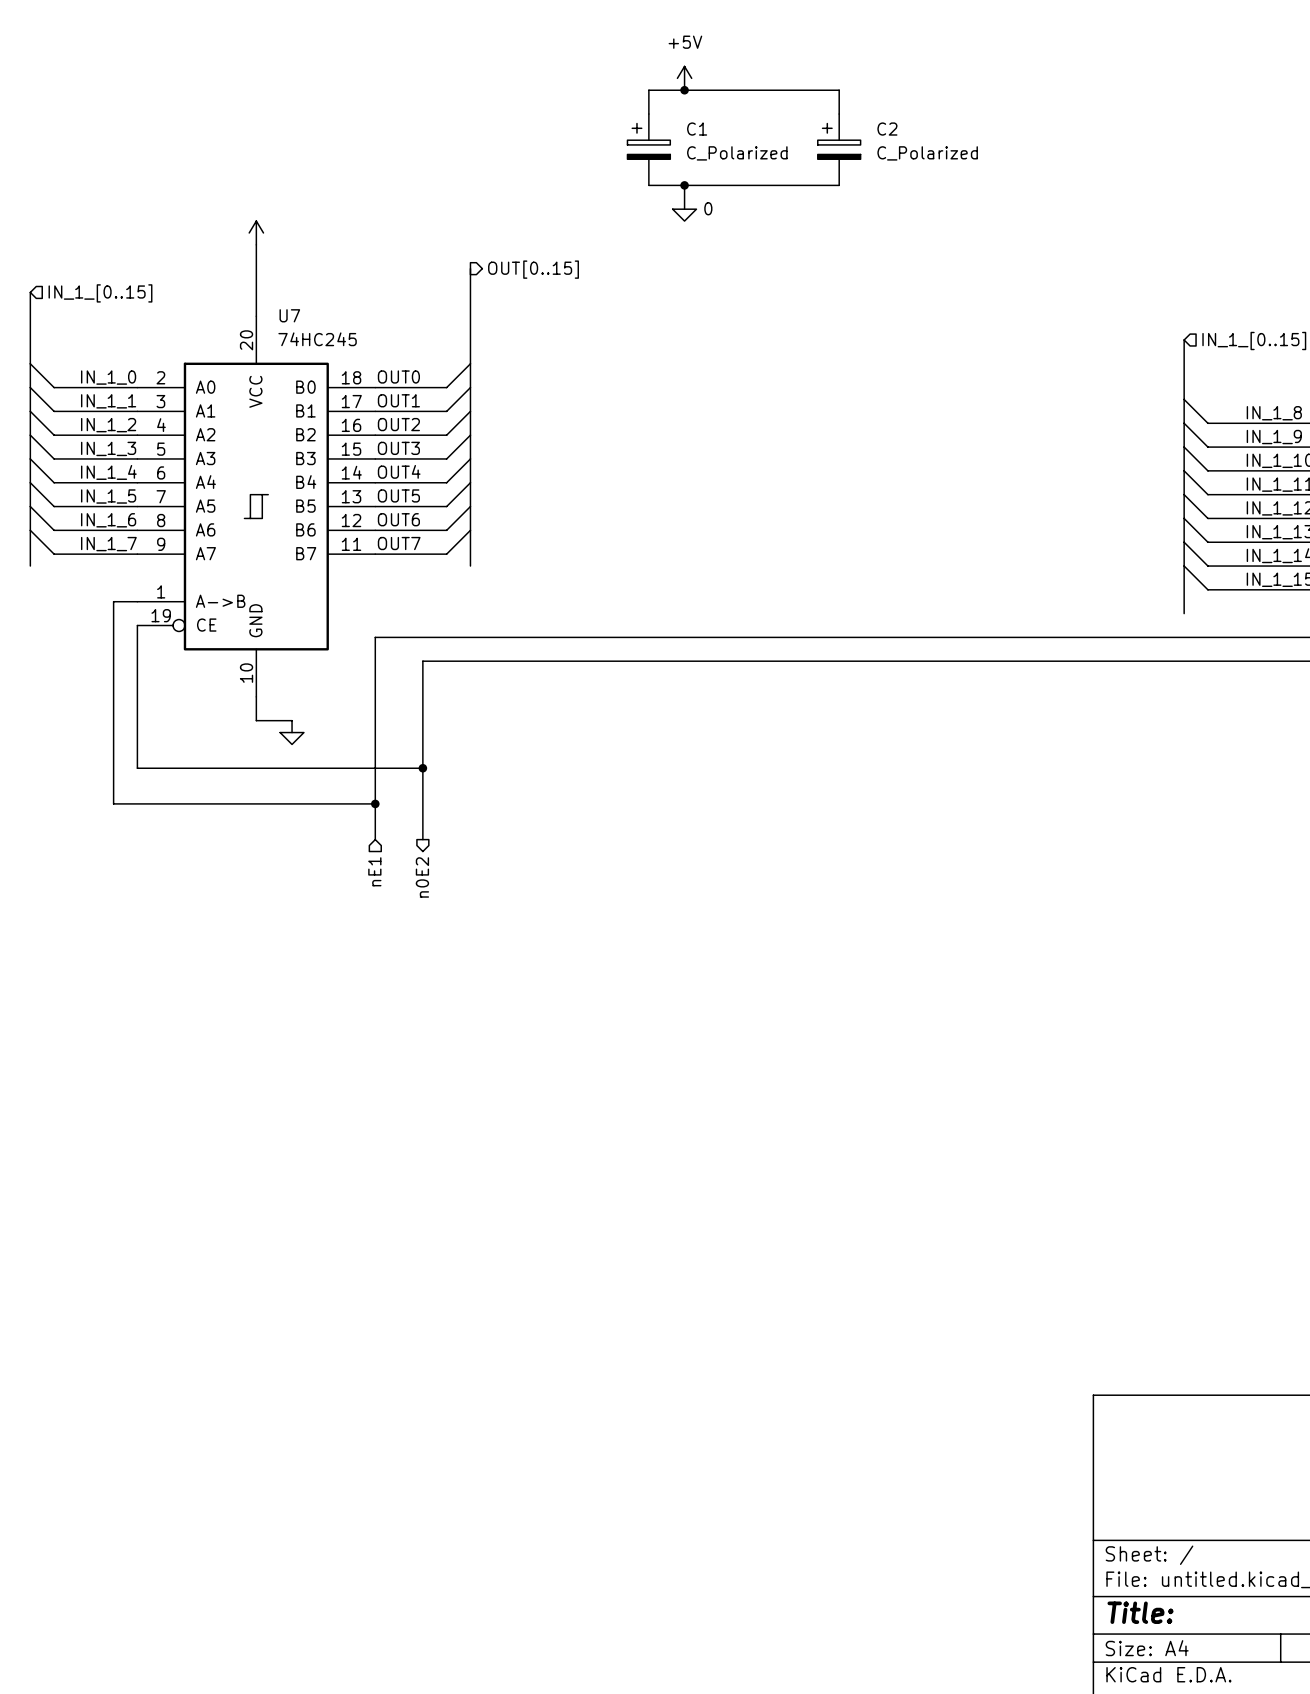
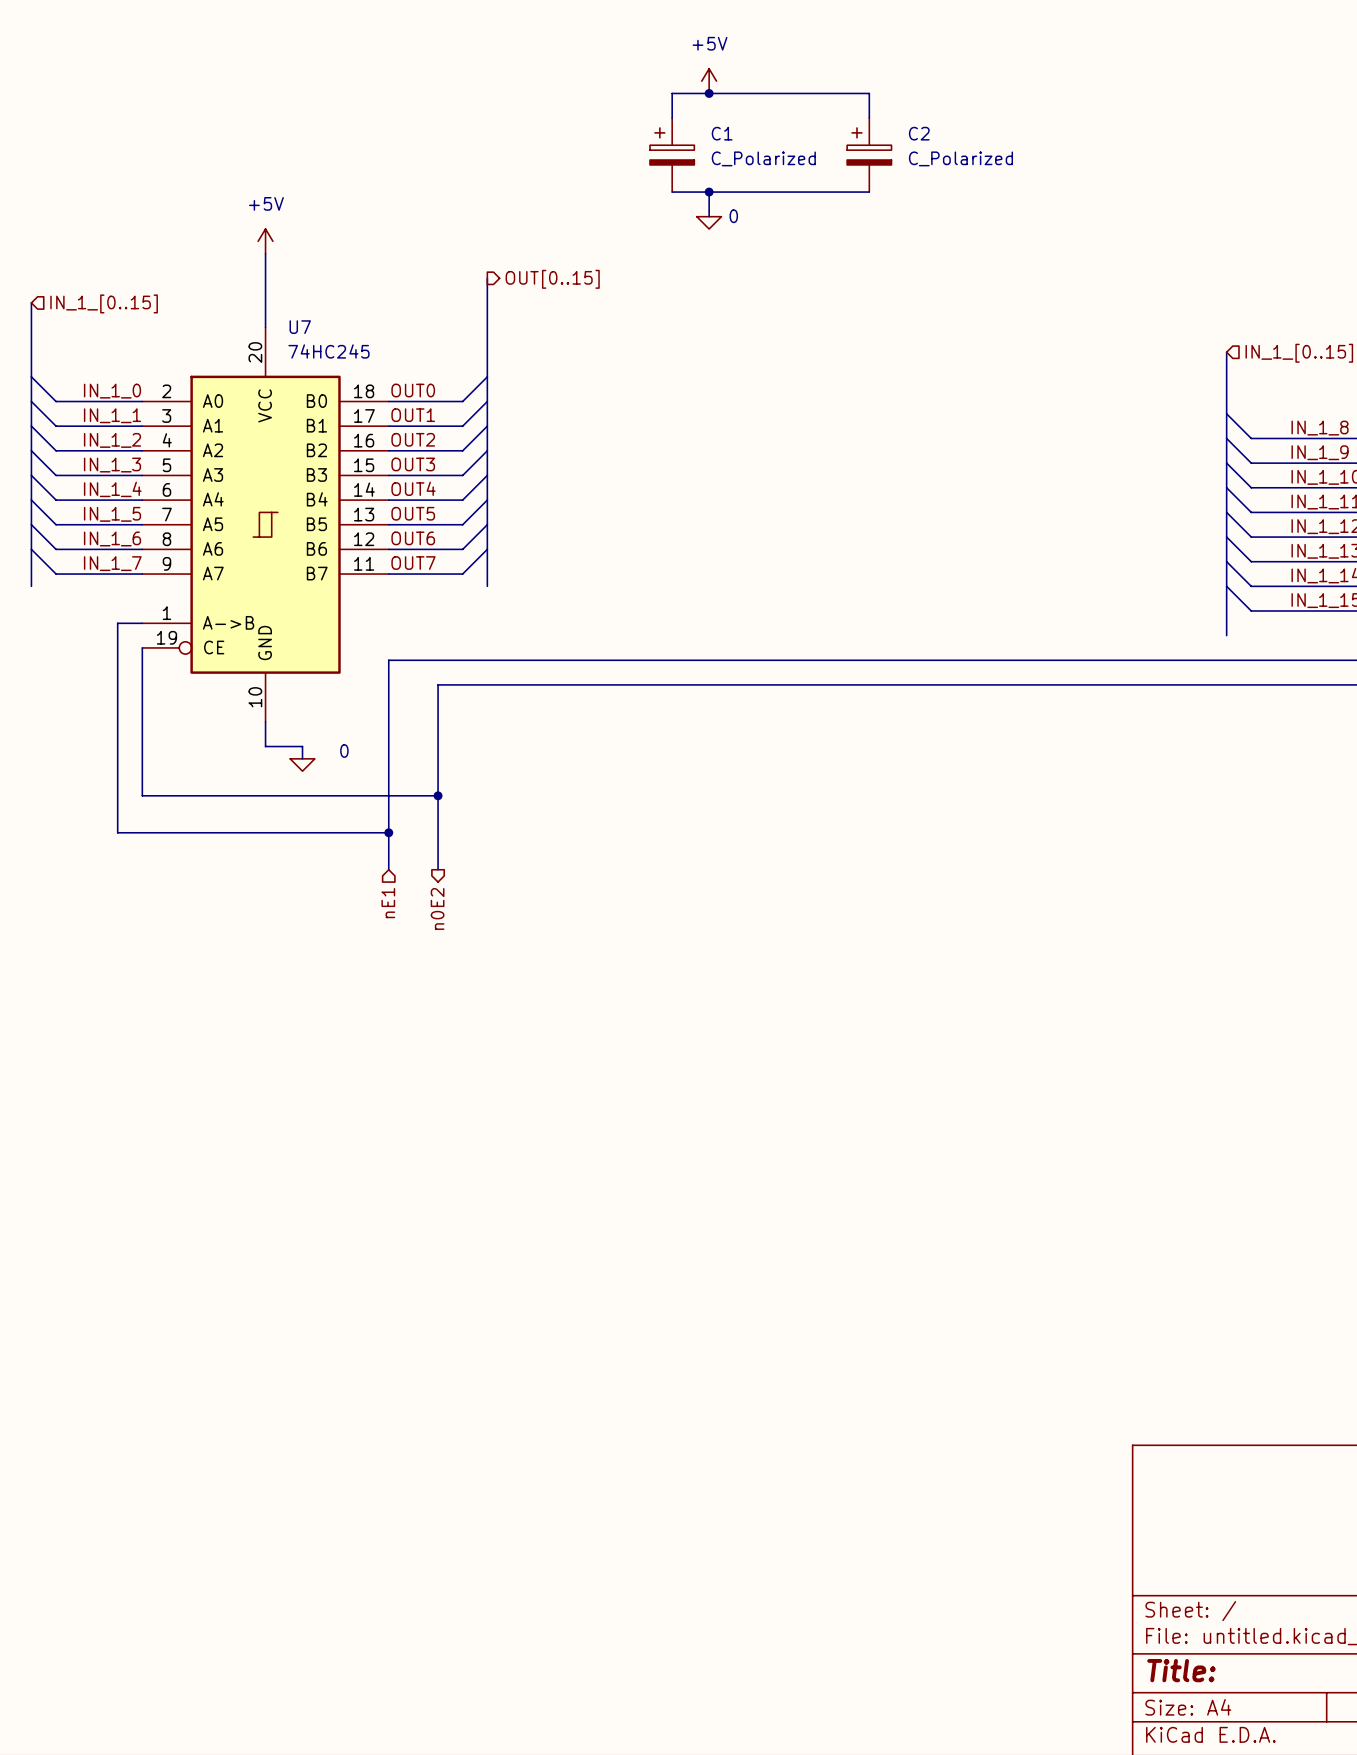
power symbol text: none -> +5V (266, 203)
power symbol text: none -> 0 (344, 751)

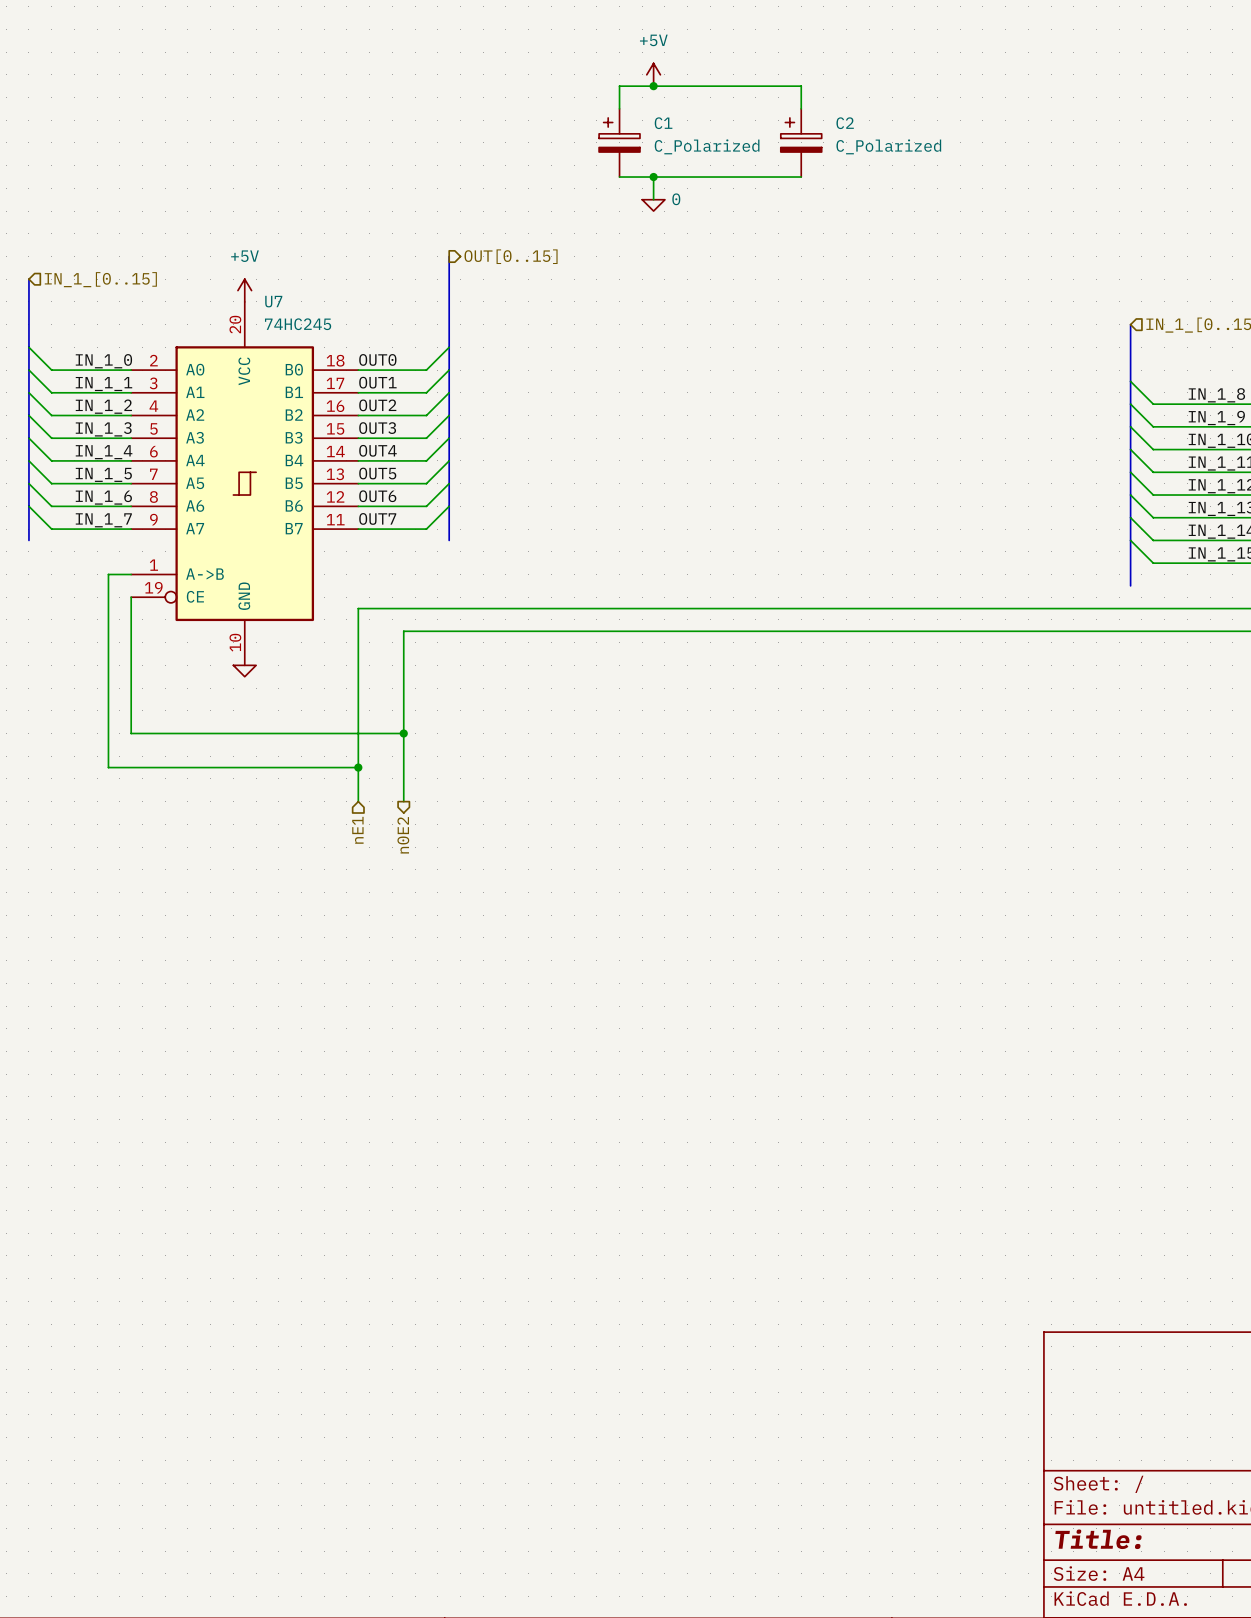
power symbol position: +5V (265, 241) -> +5V (244, 290)
wire: (265, 253) (265, 327) -> none
wire: (265, 721) (265, 746) (302, 746) (302, 758) -> none
power symbol: none -> (244, 671)
power symbol: 0 (302, 765) -> none

